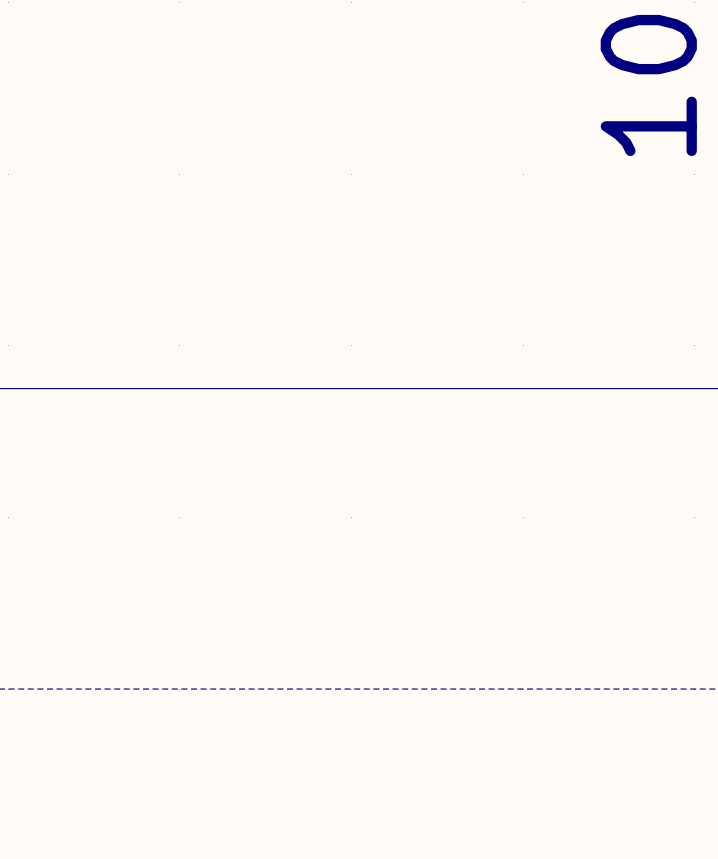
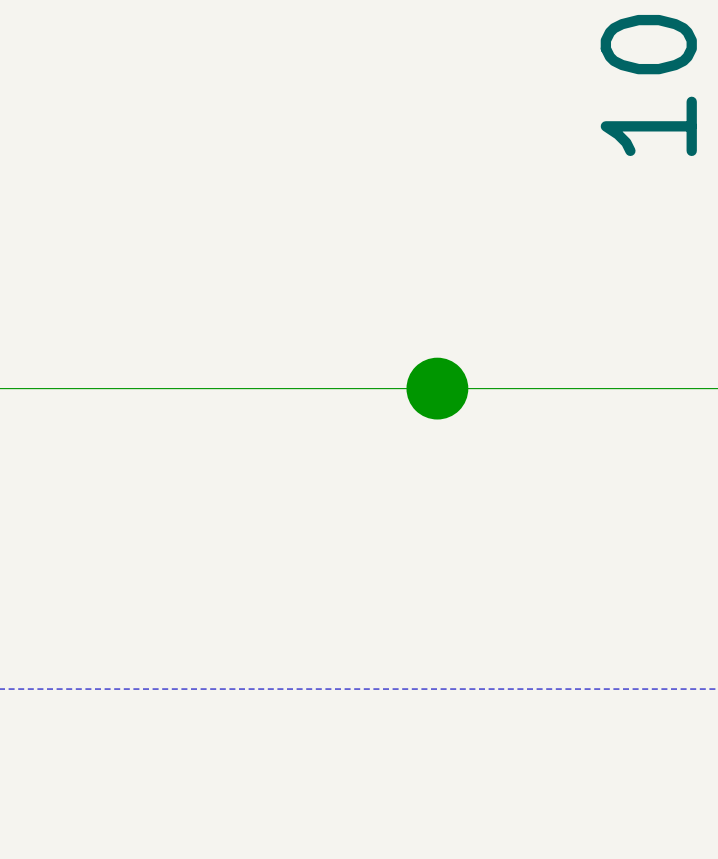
junction: none -> (437, 388)

